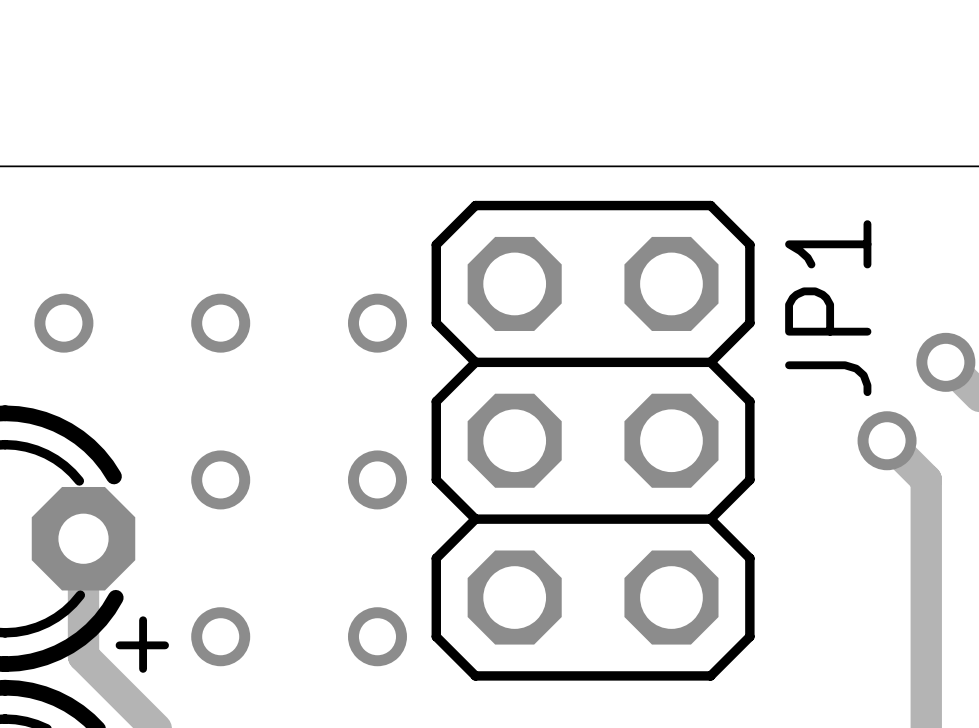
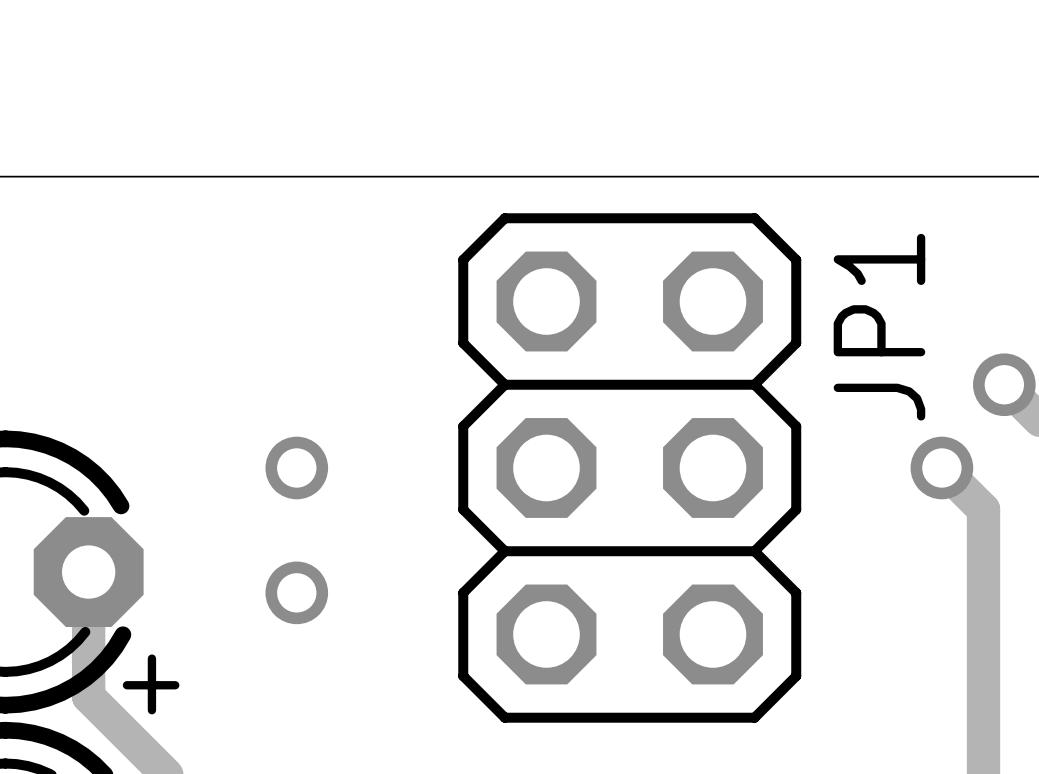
via: (63, 323) -> none
via: (220, 323) -> none
via: (377, 323) -> none
via: none -> (296, 467)
via: (220, 479) -> none
via: (377, 479) -> none
via: none -> (296, 592)
via: (220, 636) -> none
via: (377, 636) -> none

